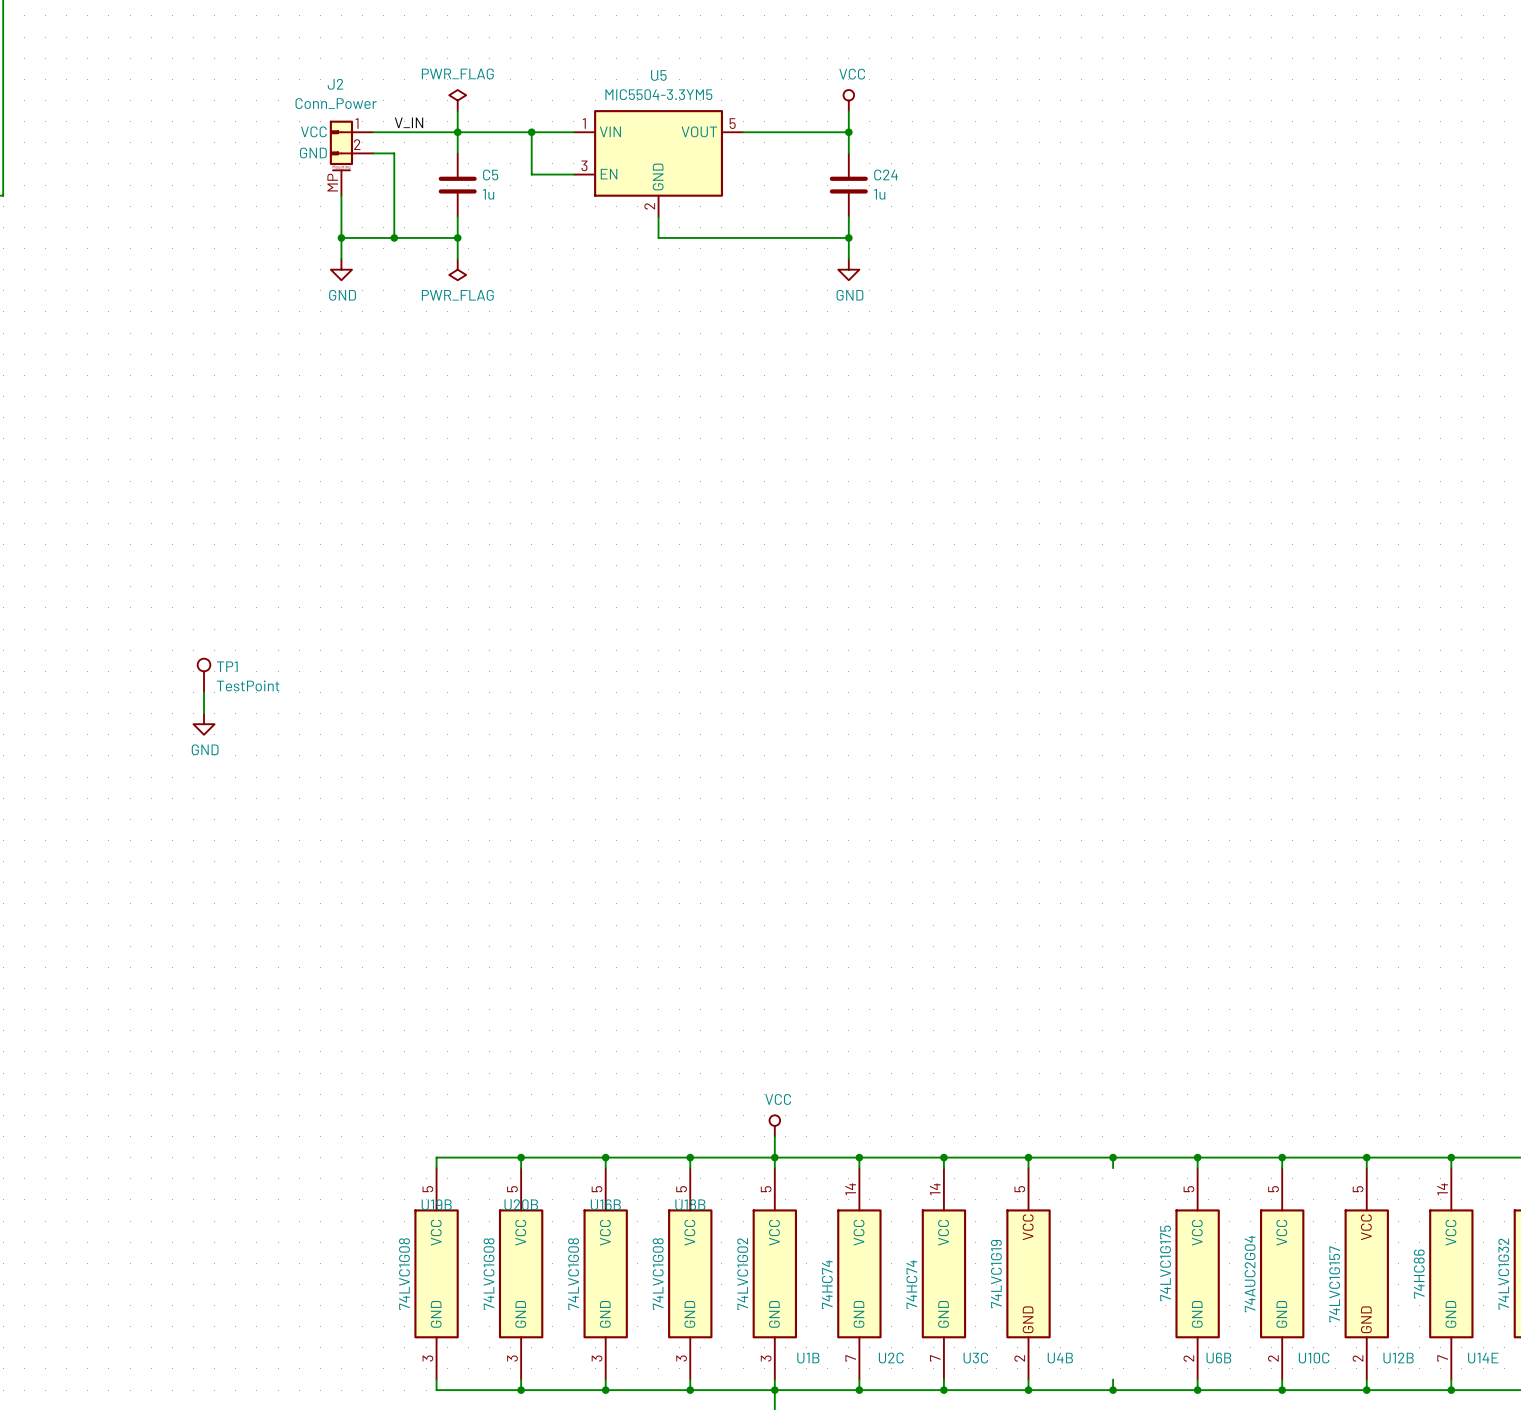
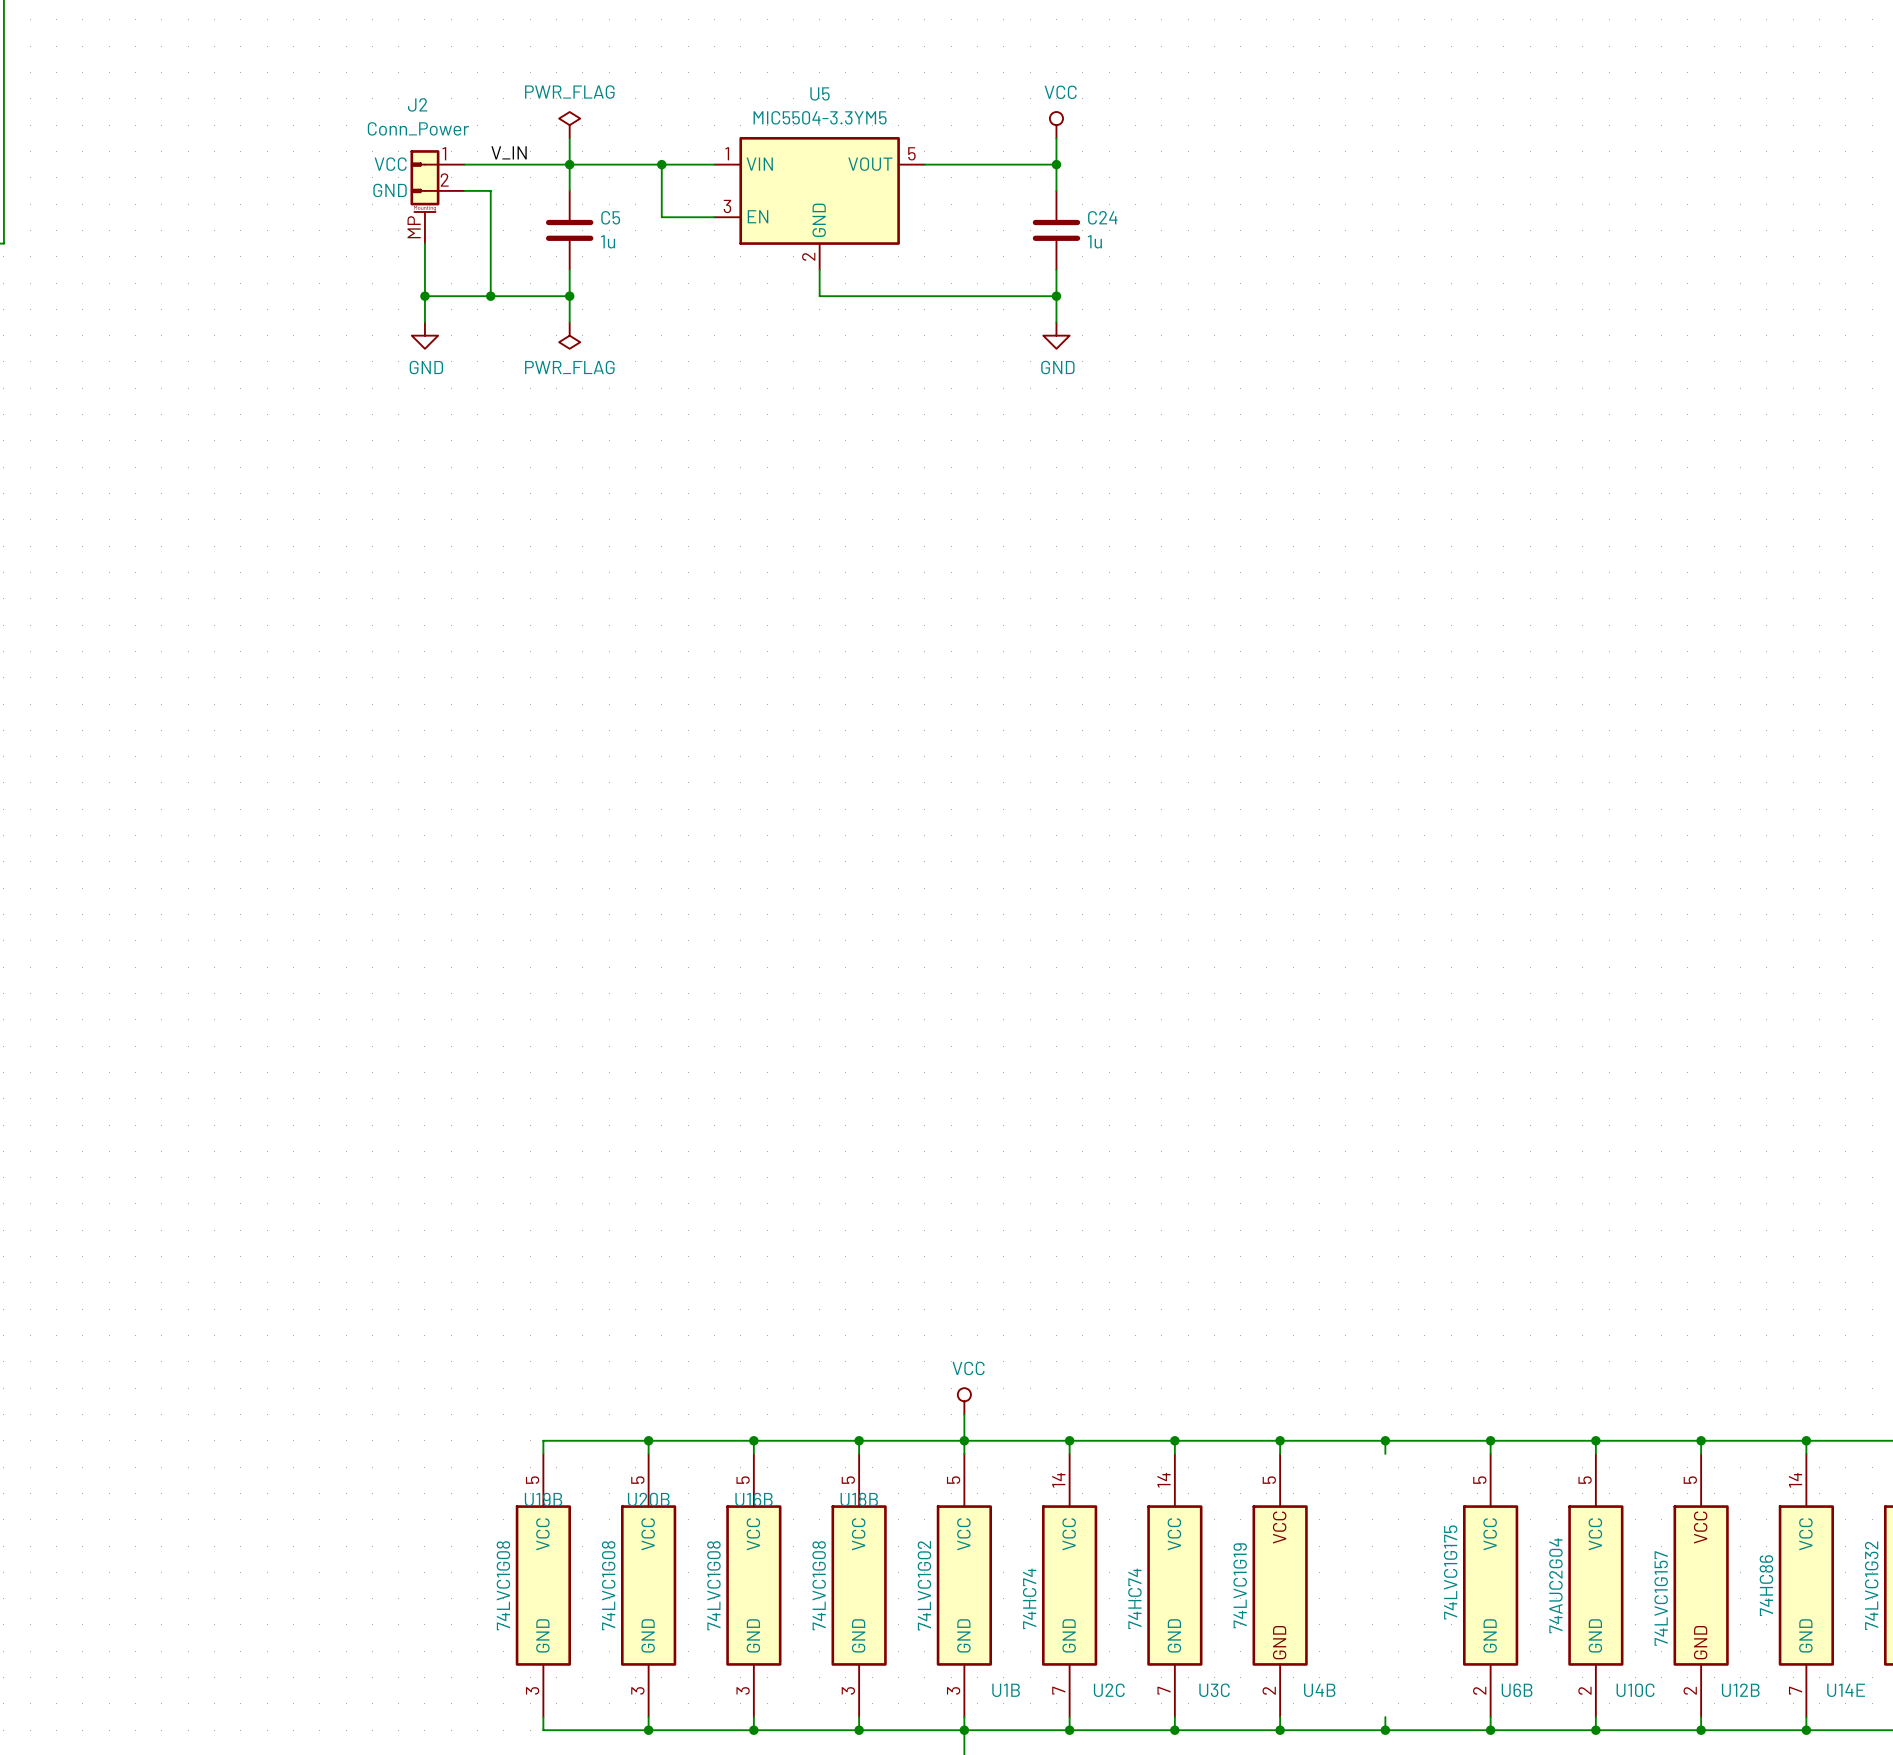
TP1: TestPoint (204, 675) -> none
wire: (204, 692) (204, 713) -> none
power symbol: GND (204, 724) -> none

